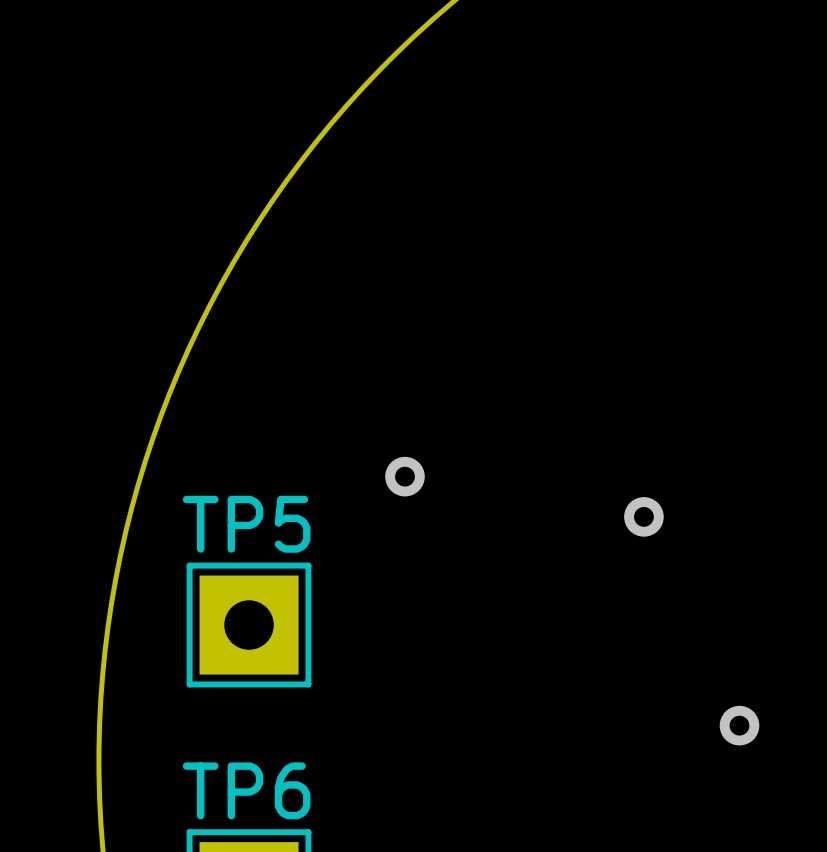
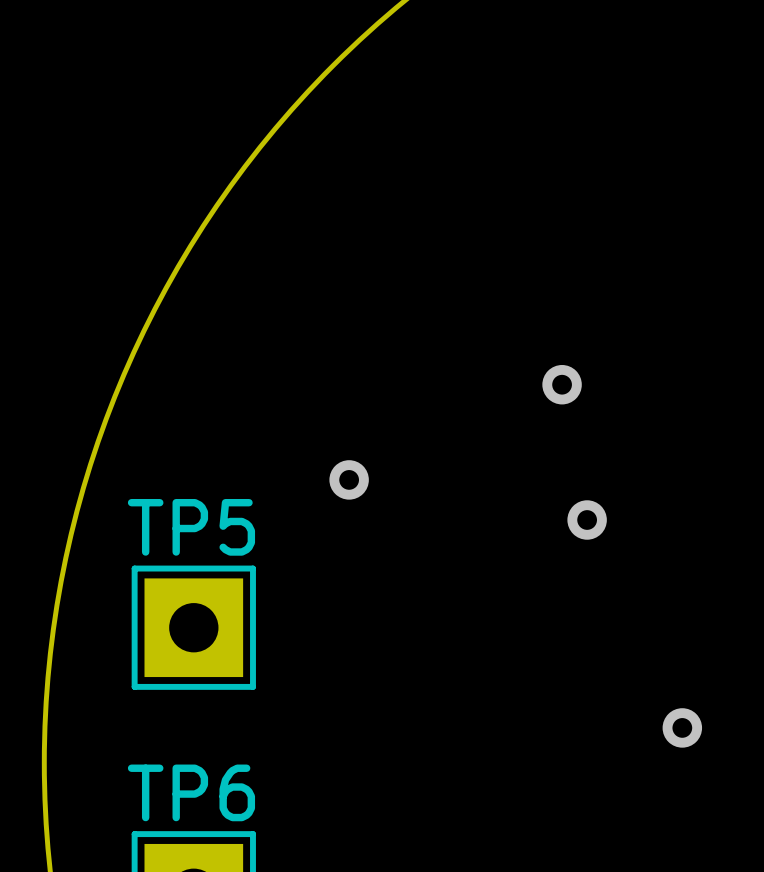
via: none -> (562, 384)

